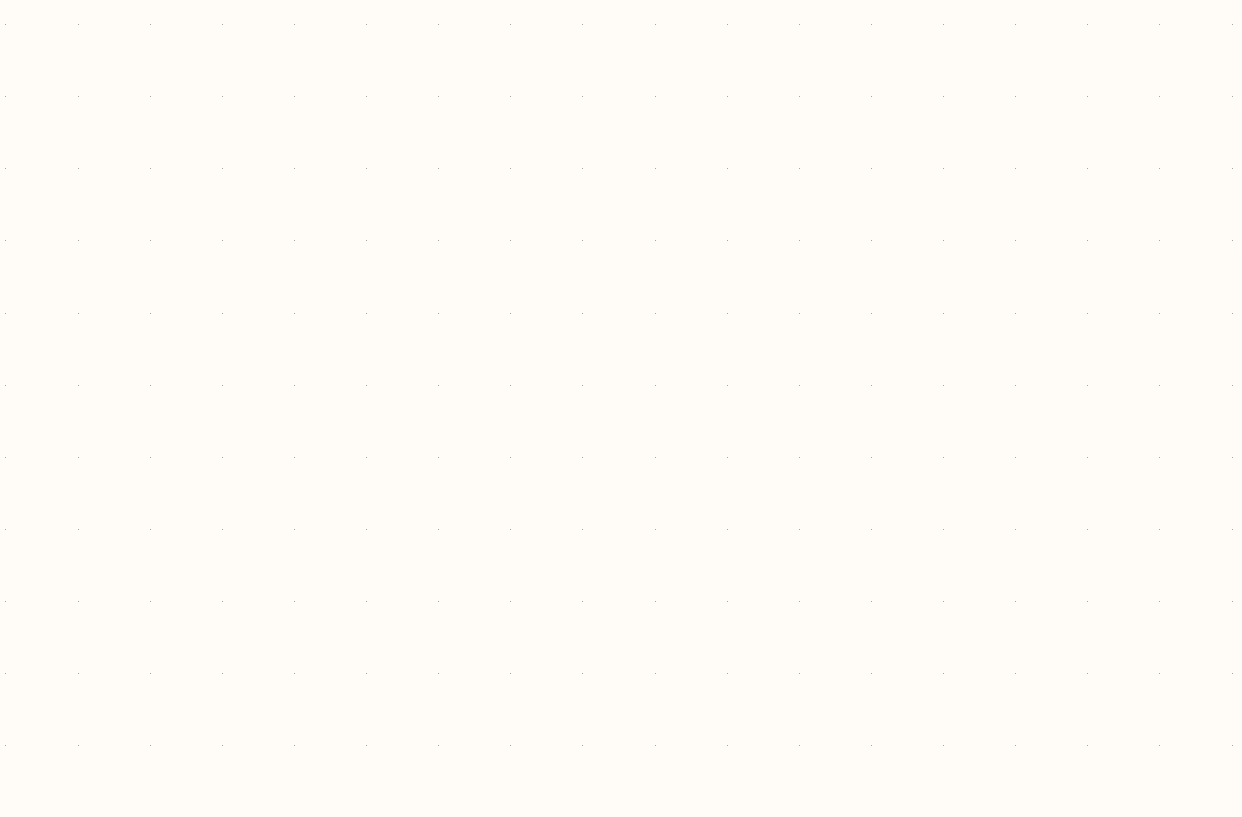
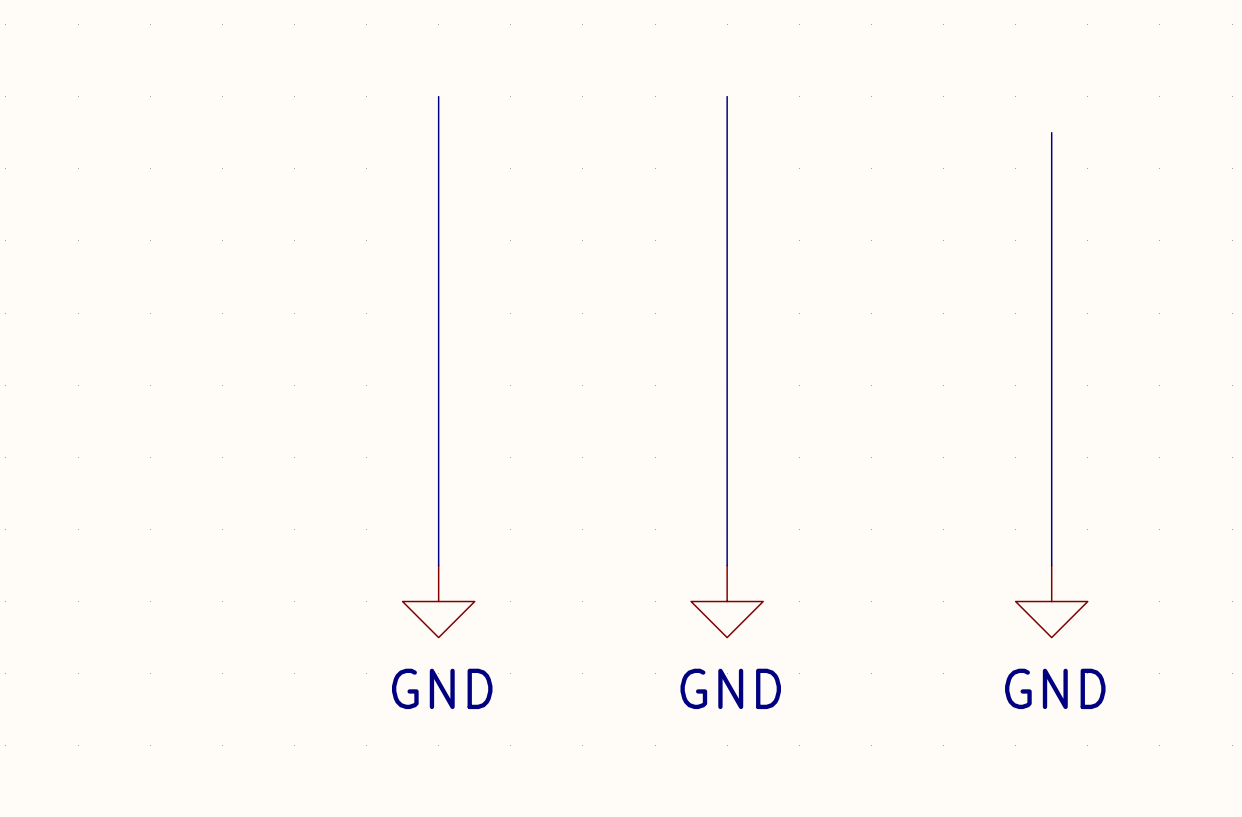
wire: none -> (438, 96) (438, 565)
wire: none -> (727, 96) (727, 565)
wire: none -> (1051, 132) (1051, 565)
power symbol: none -> GND (438, 601)
power symbol: none -> GND (727, 601)
power symbol: none -> GND (1051, 601)

